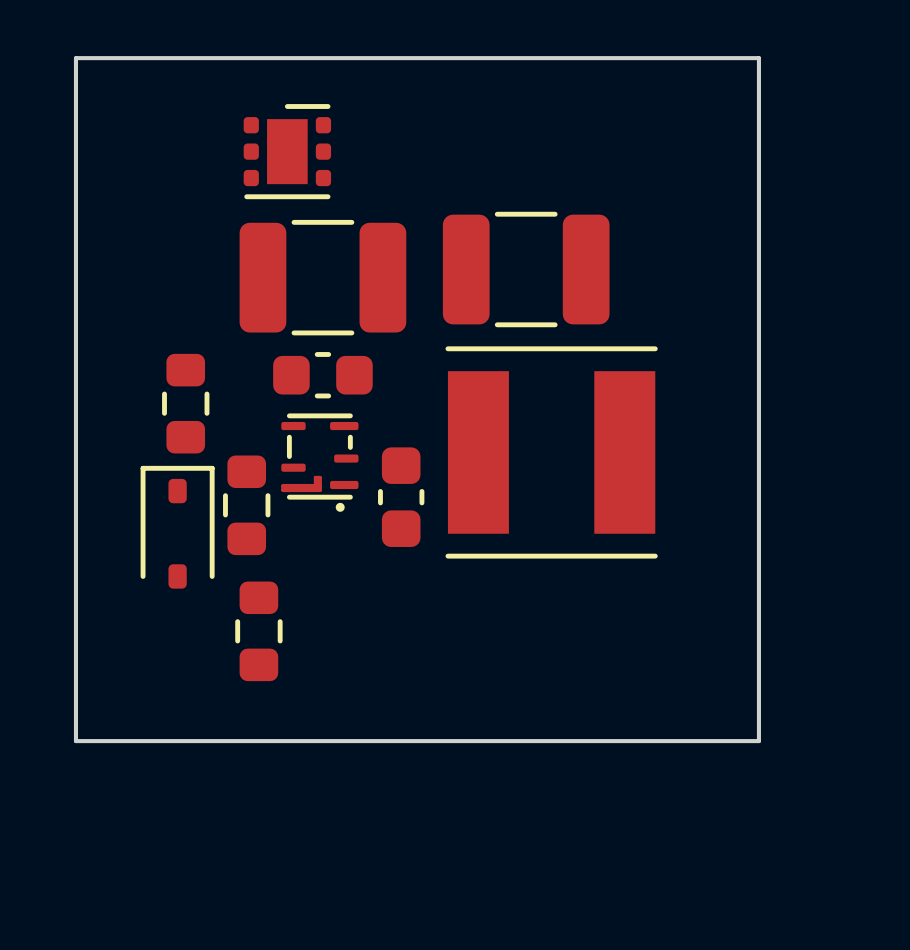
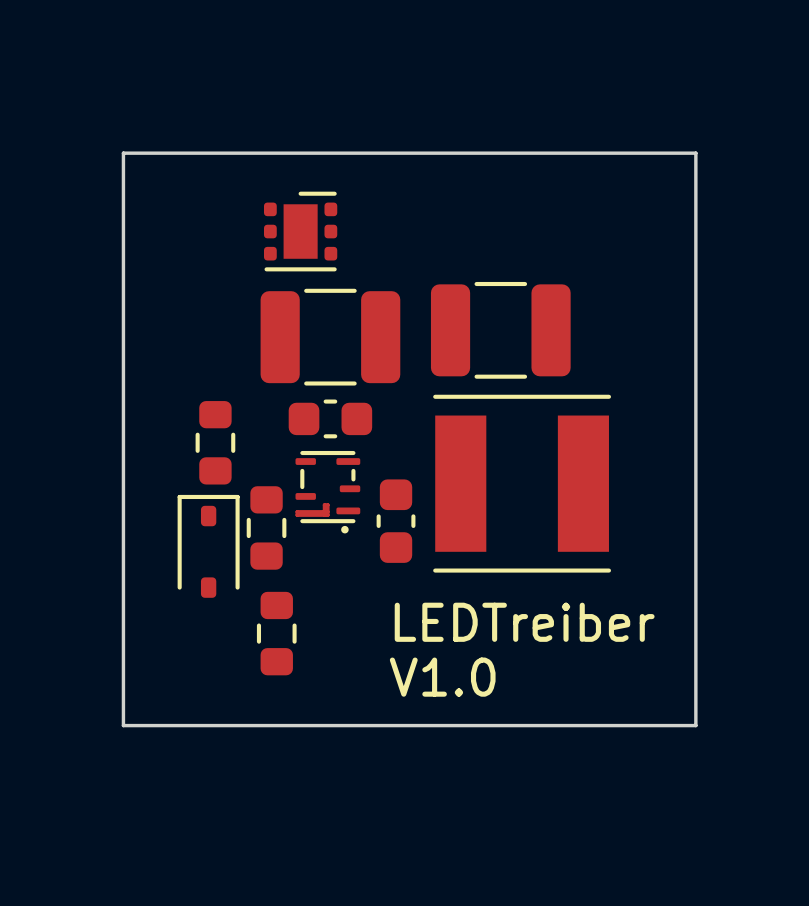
text: none -> LEDTreiber (524, 622)
text: none -> V1.0 (442, 677)

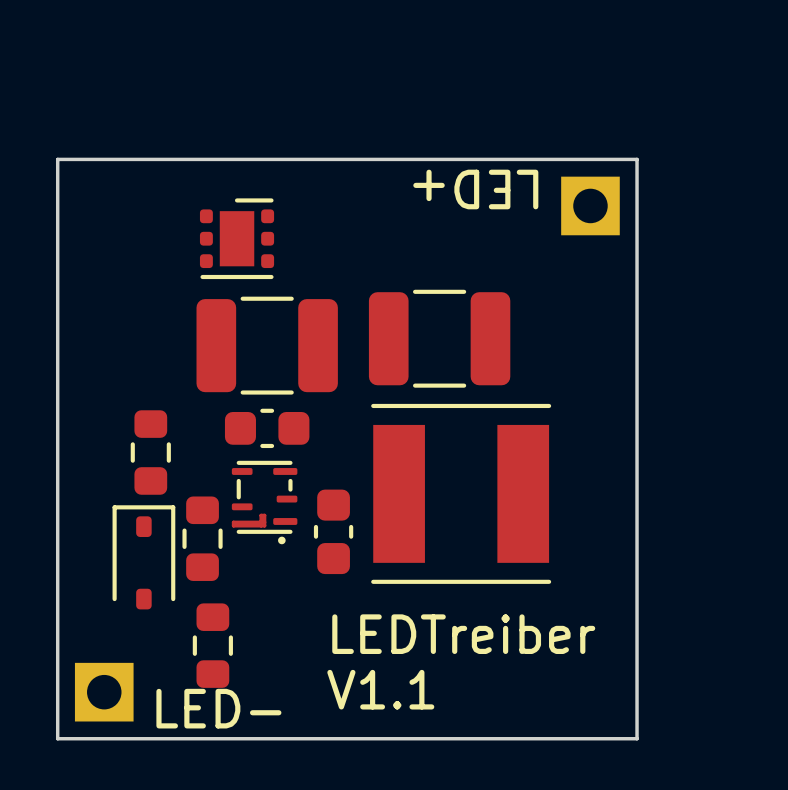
text: none -> LED+ (475, 189)
part: none -> (590, 205)
text: V1.0 (442, 677) -> V1.1 (380, 689)
part: none -> (104, 692)
text: none -> LED- (218, 708)

